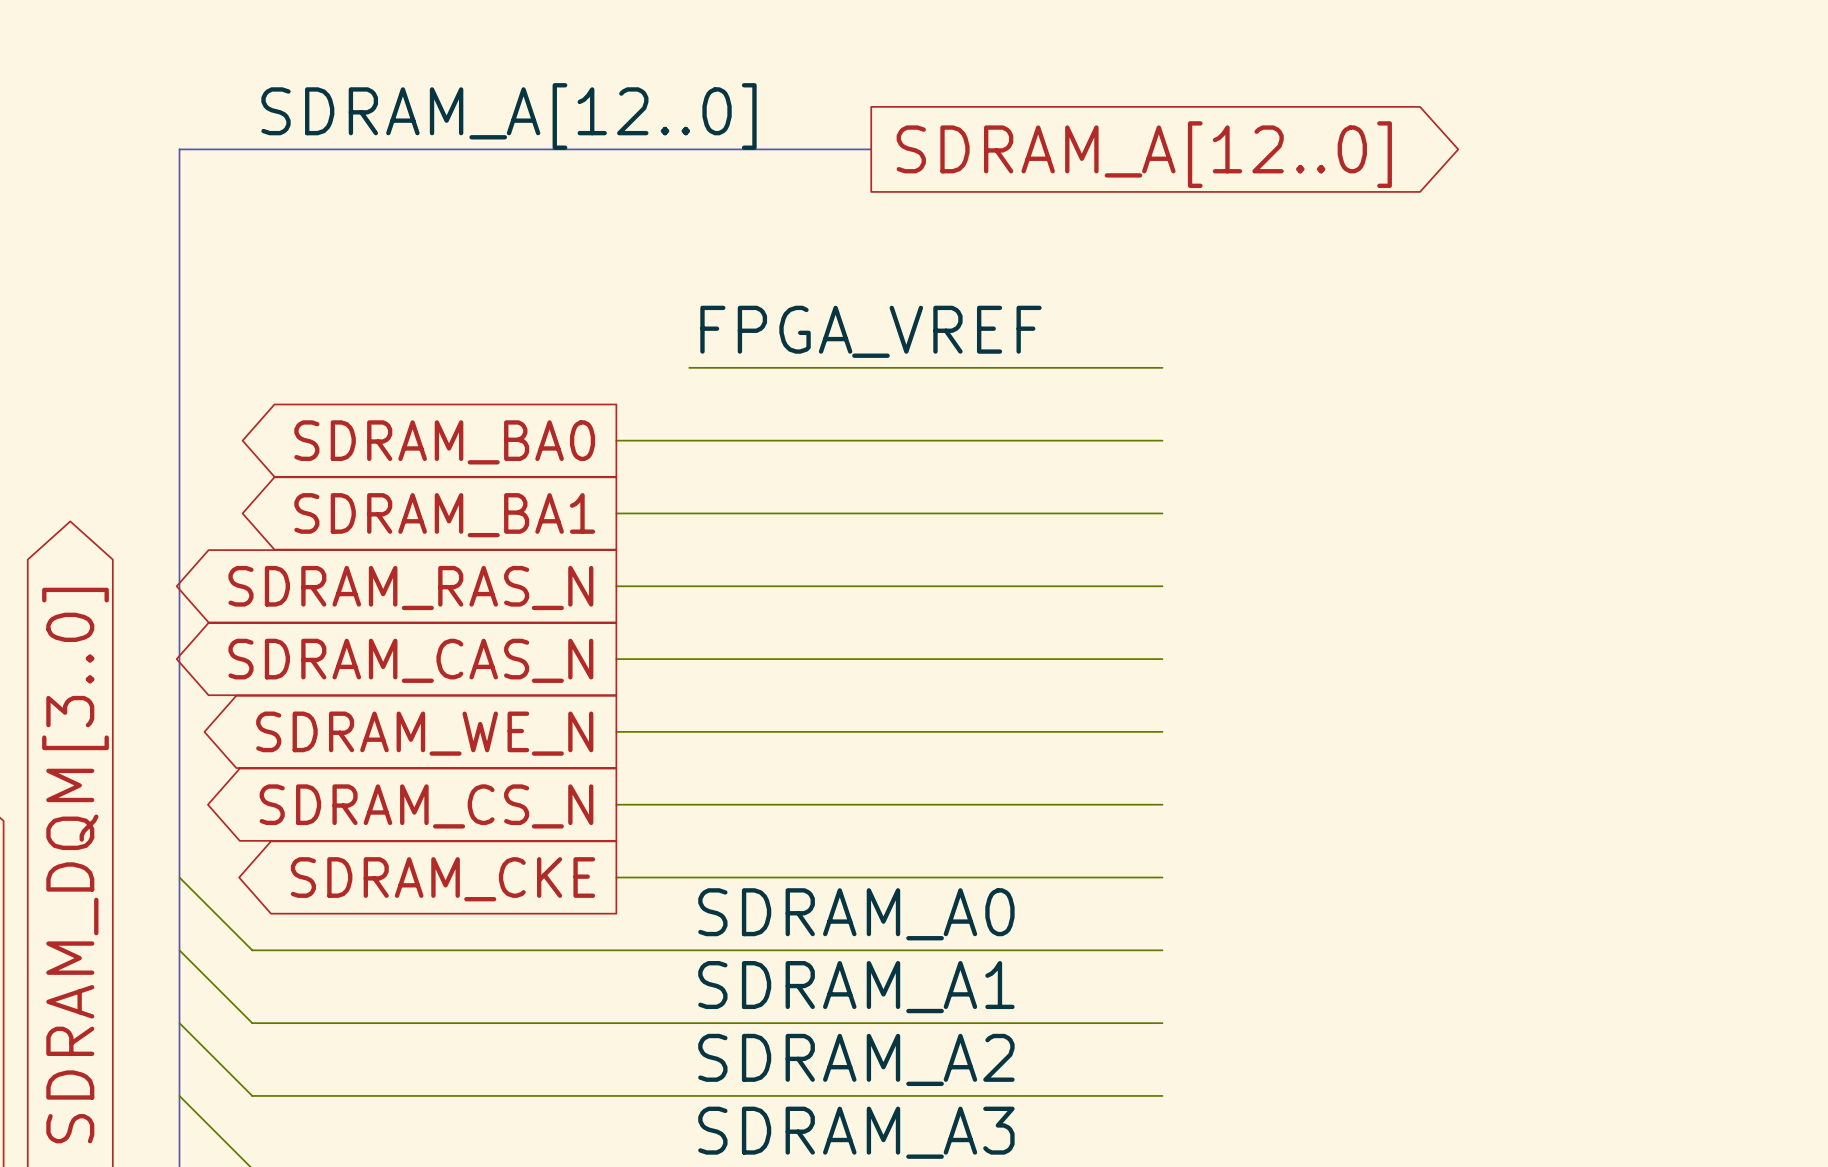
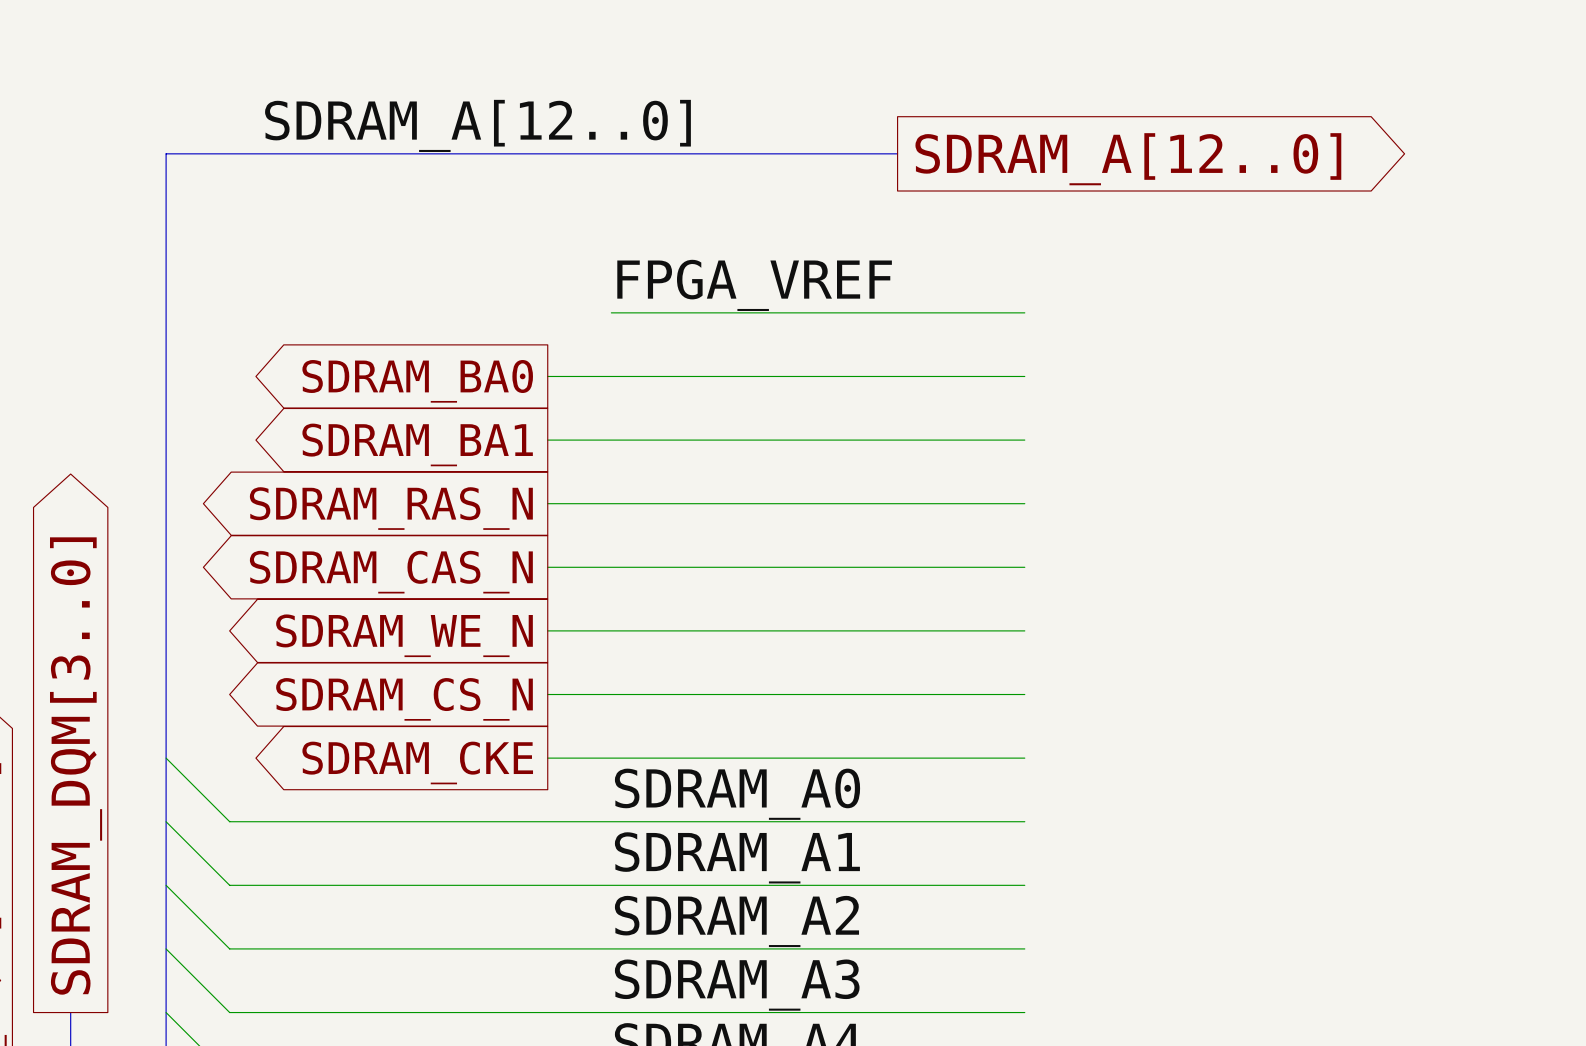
label position: SDRAM_A[12..0] (508, 116) -> SDRAM_A[12..0] (477, 125)
bus: (871, 149) (179, 149) (179, 185) -> (897, 153) (166, 153)
global label position: SDRAM_A[12..0] (1144, 154) -> SDRAM_A[12..0] (1128, 159)

